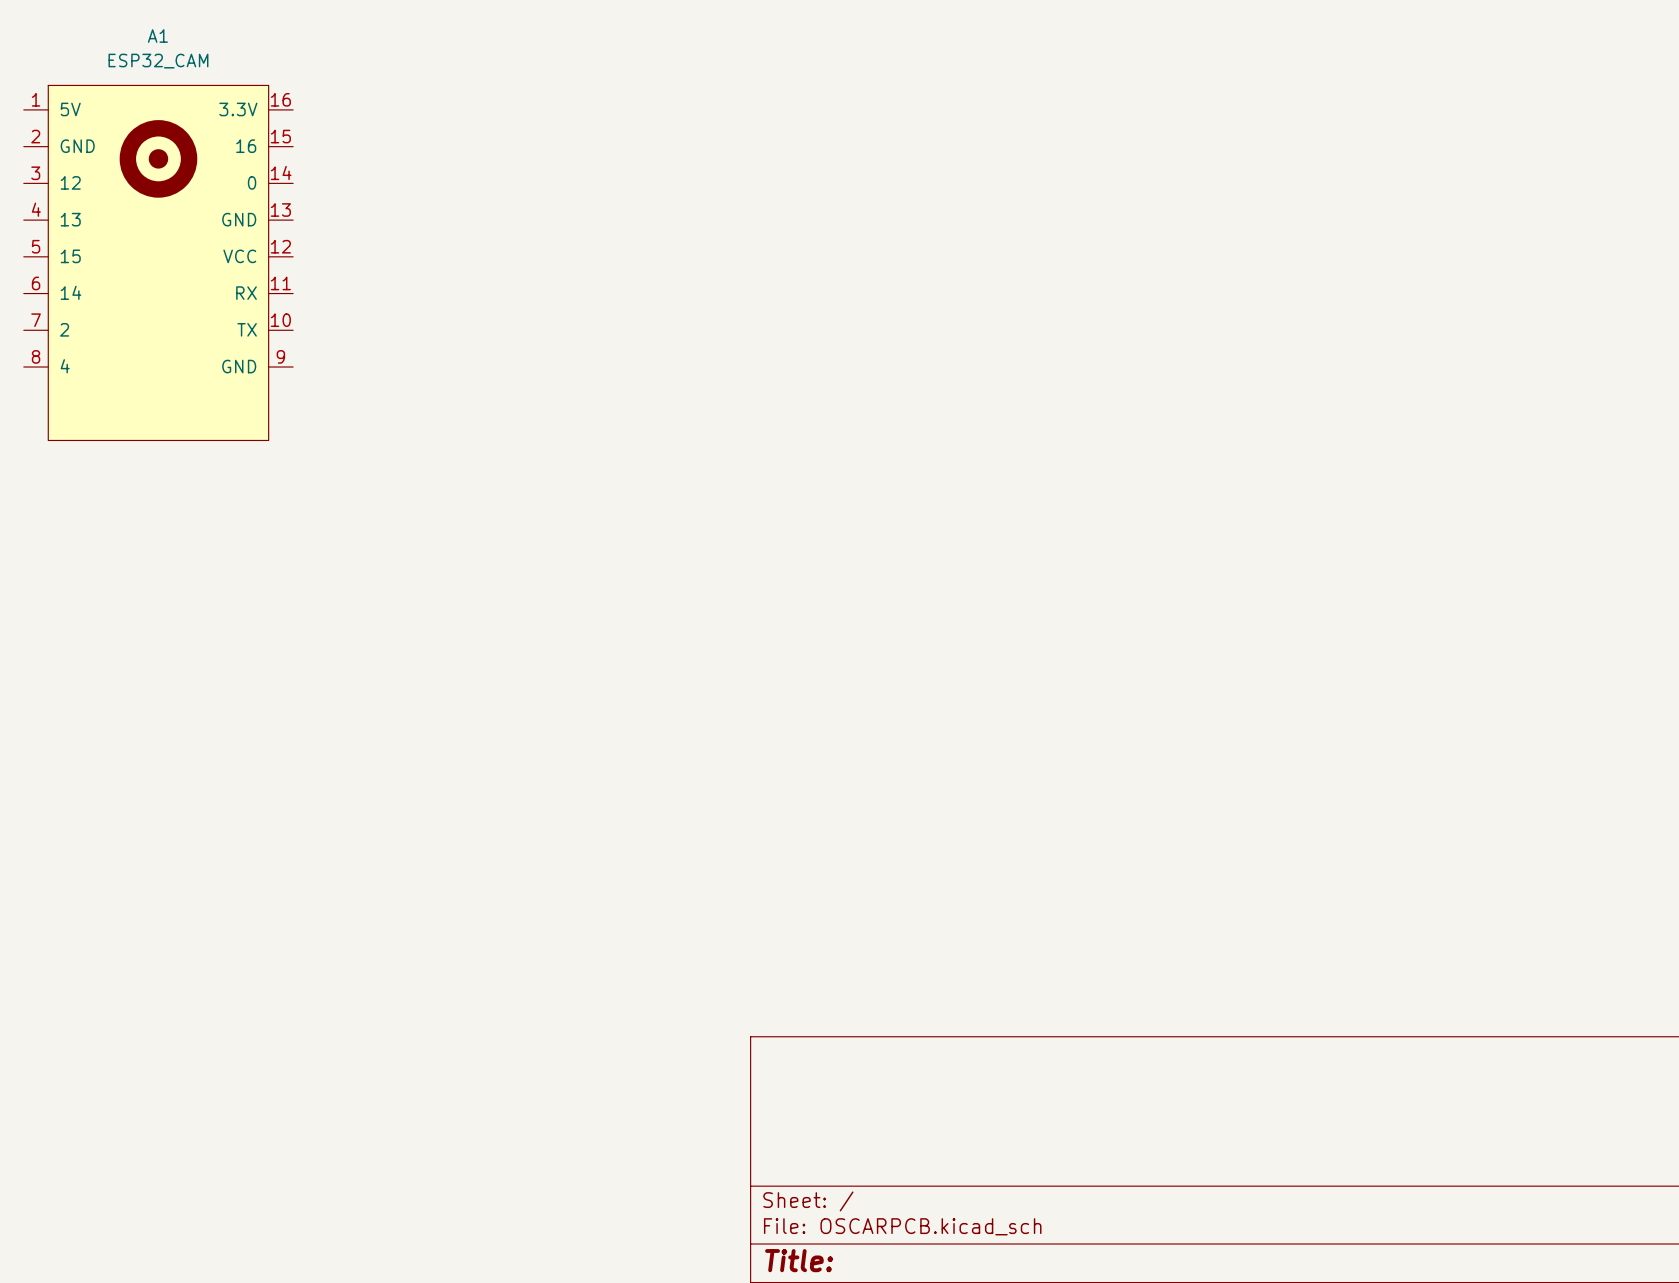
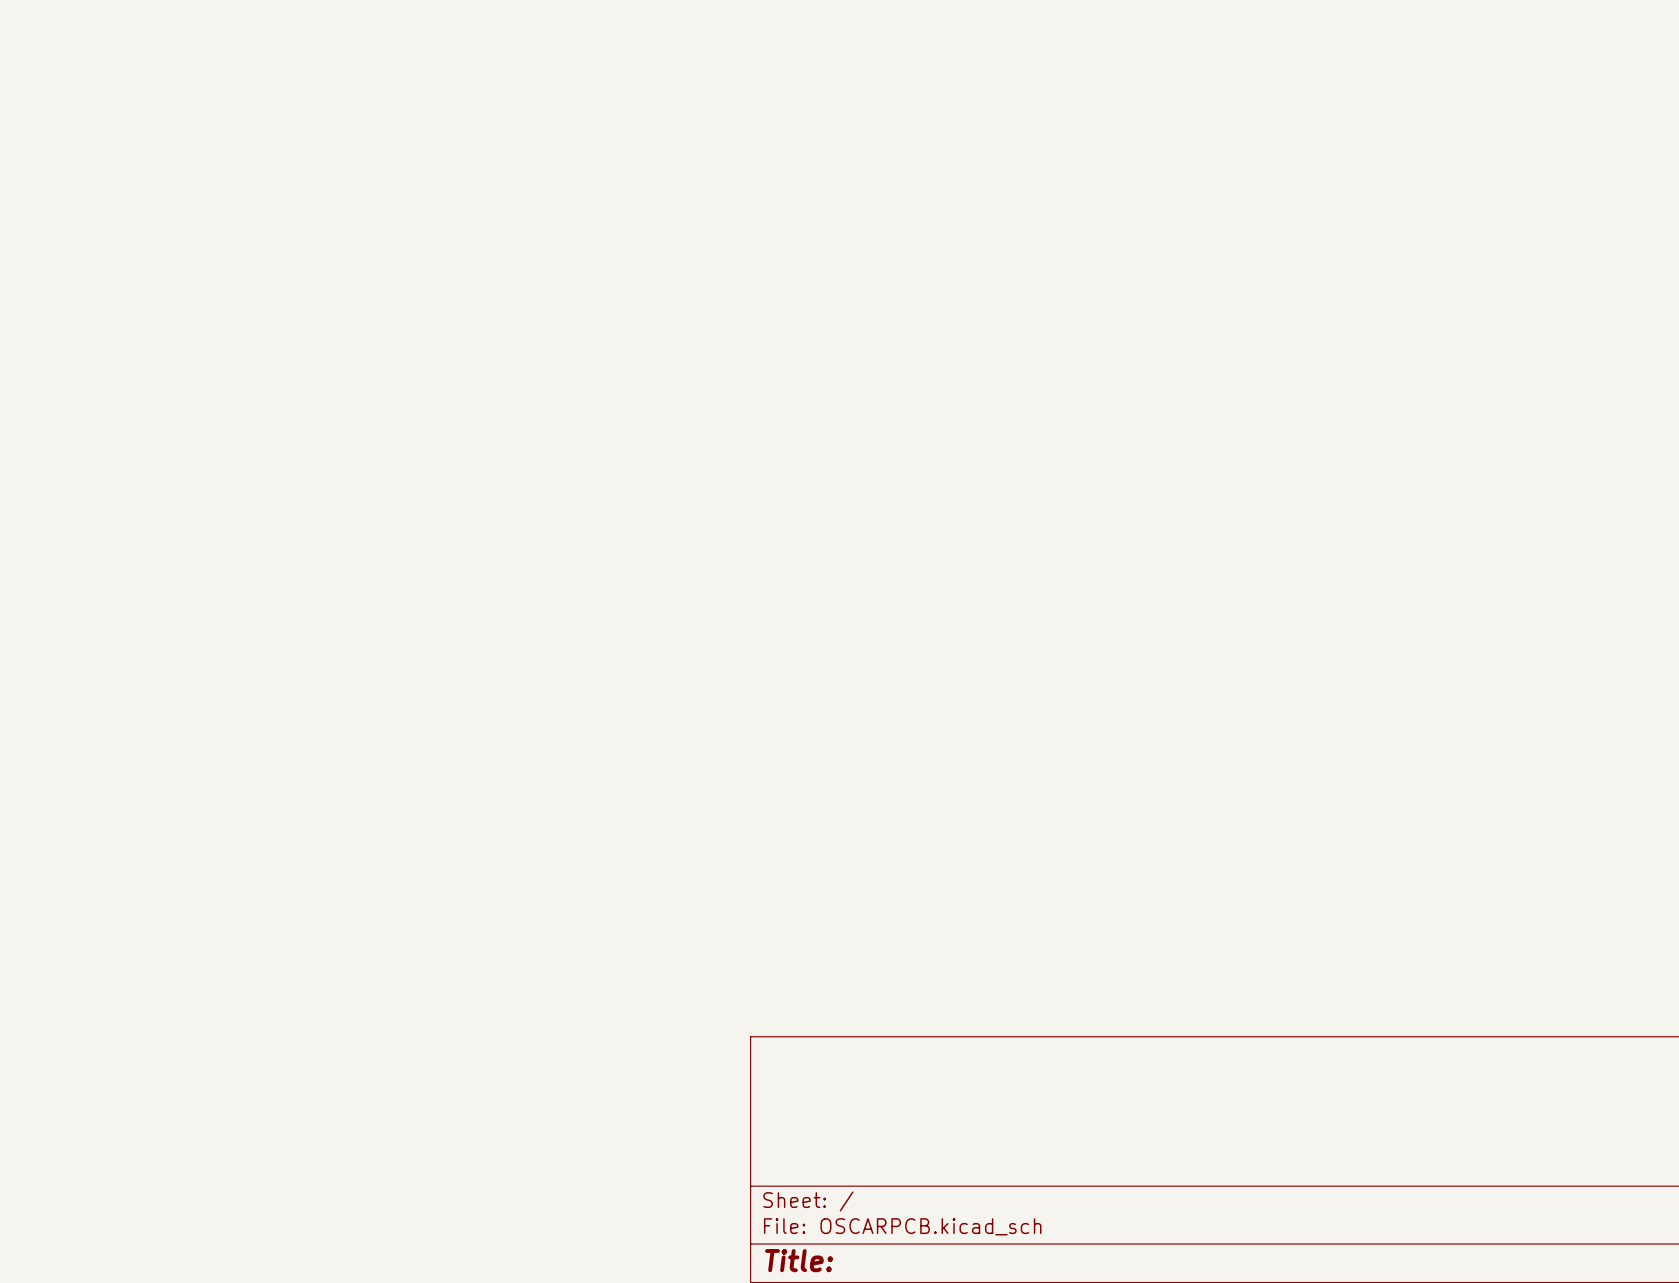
A1: ESP32_CAM (158, 262) -> none

